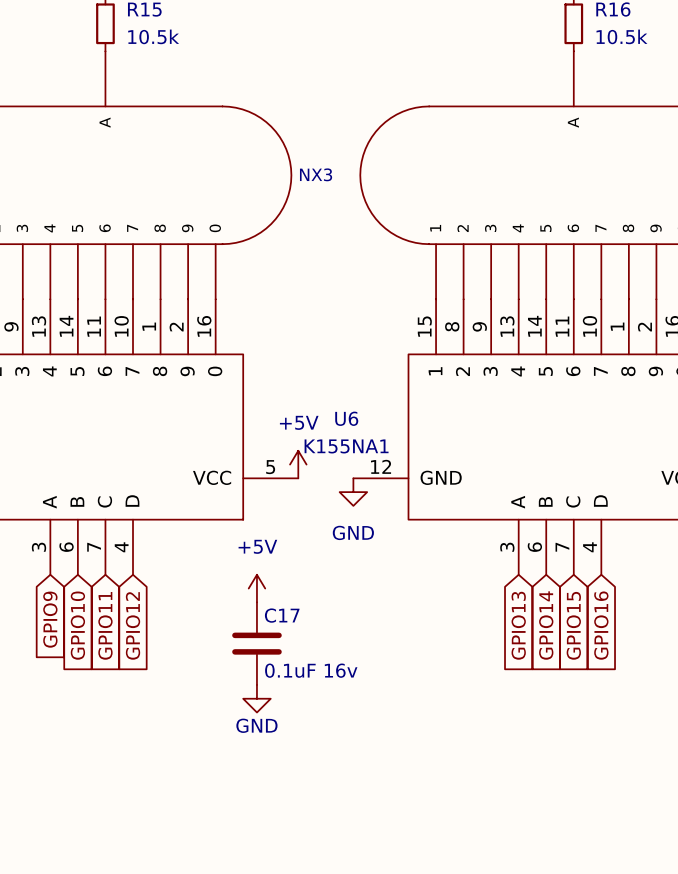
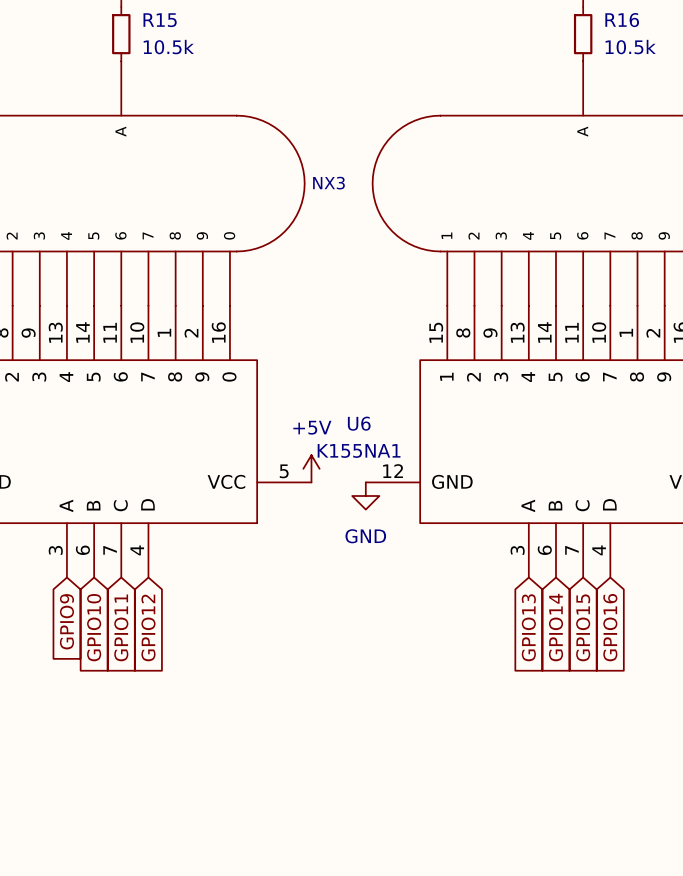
power symbol: +5V (256, 588) -> none
C17: 0.1uF 16v (256, 643) -> none
power symbol: GND (256, 698) -> none

